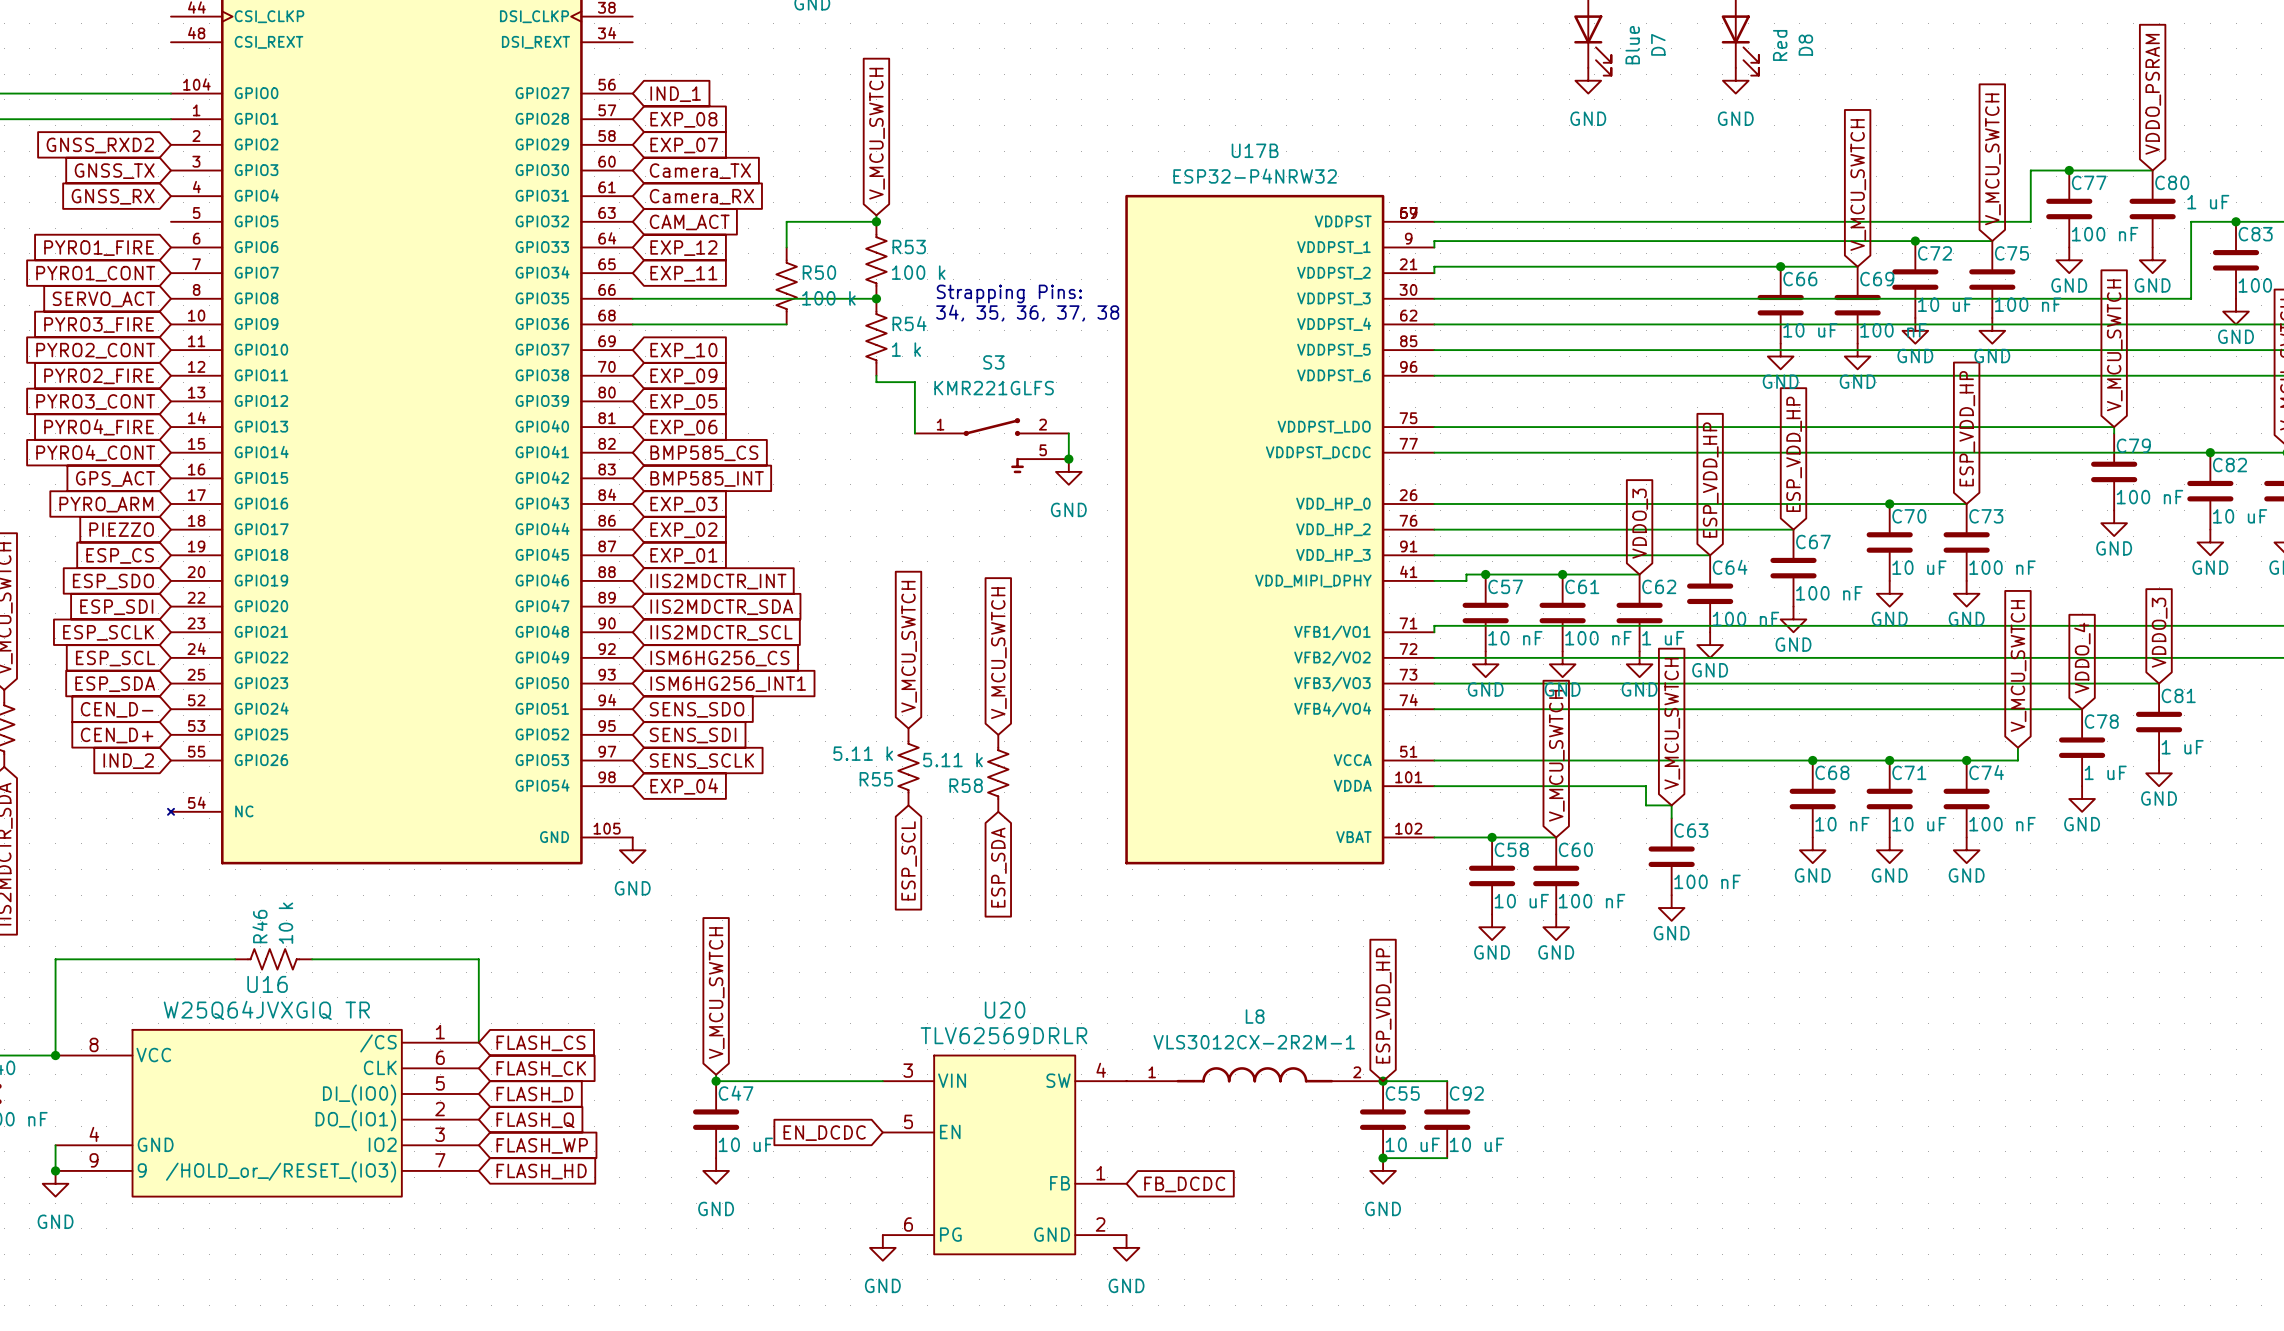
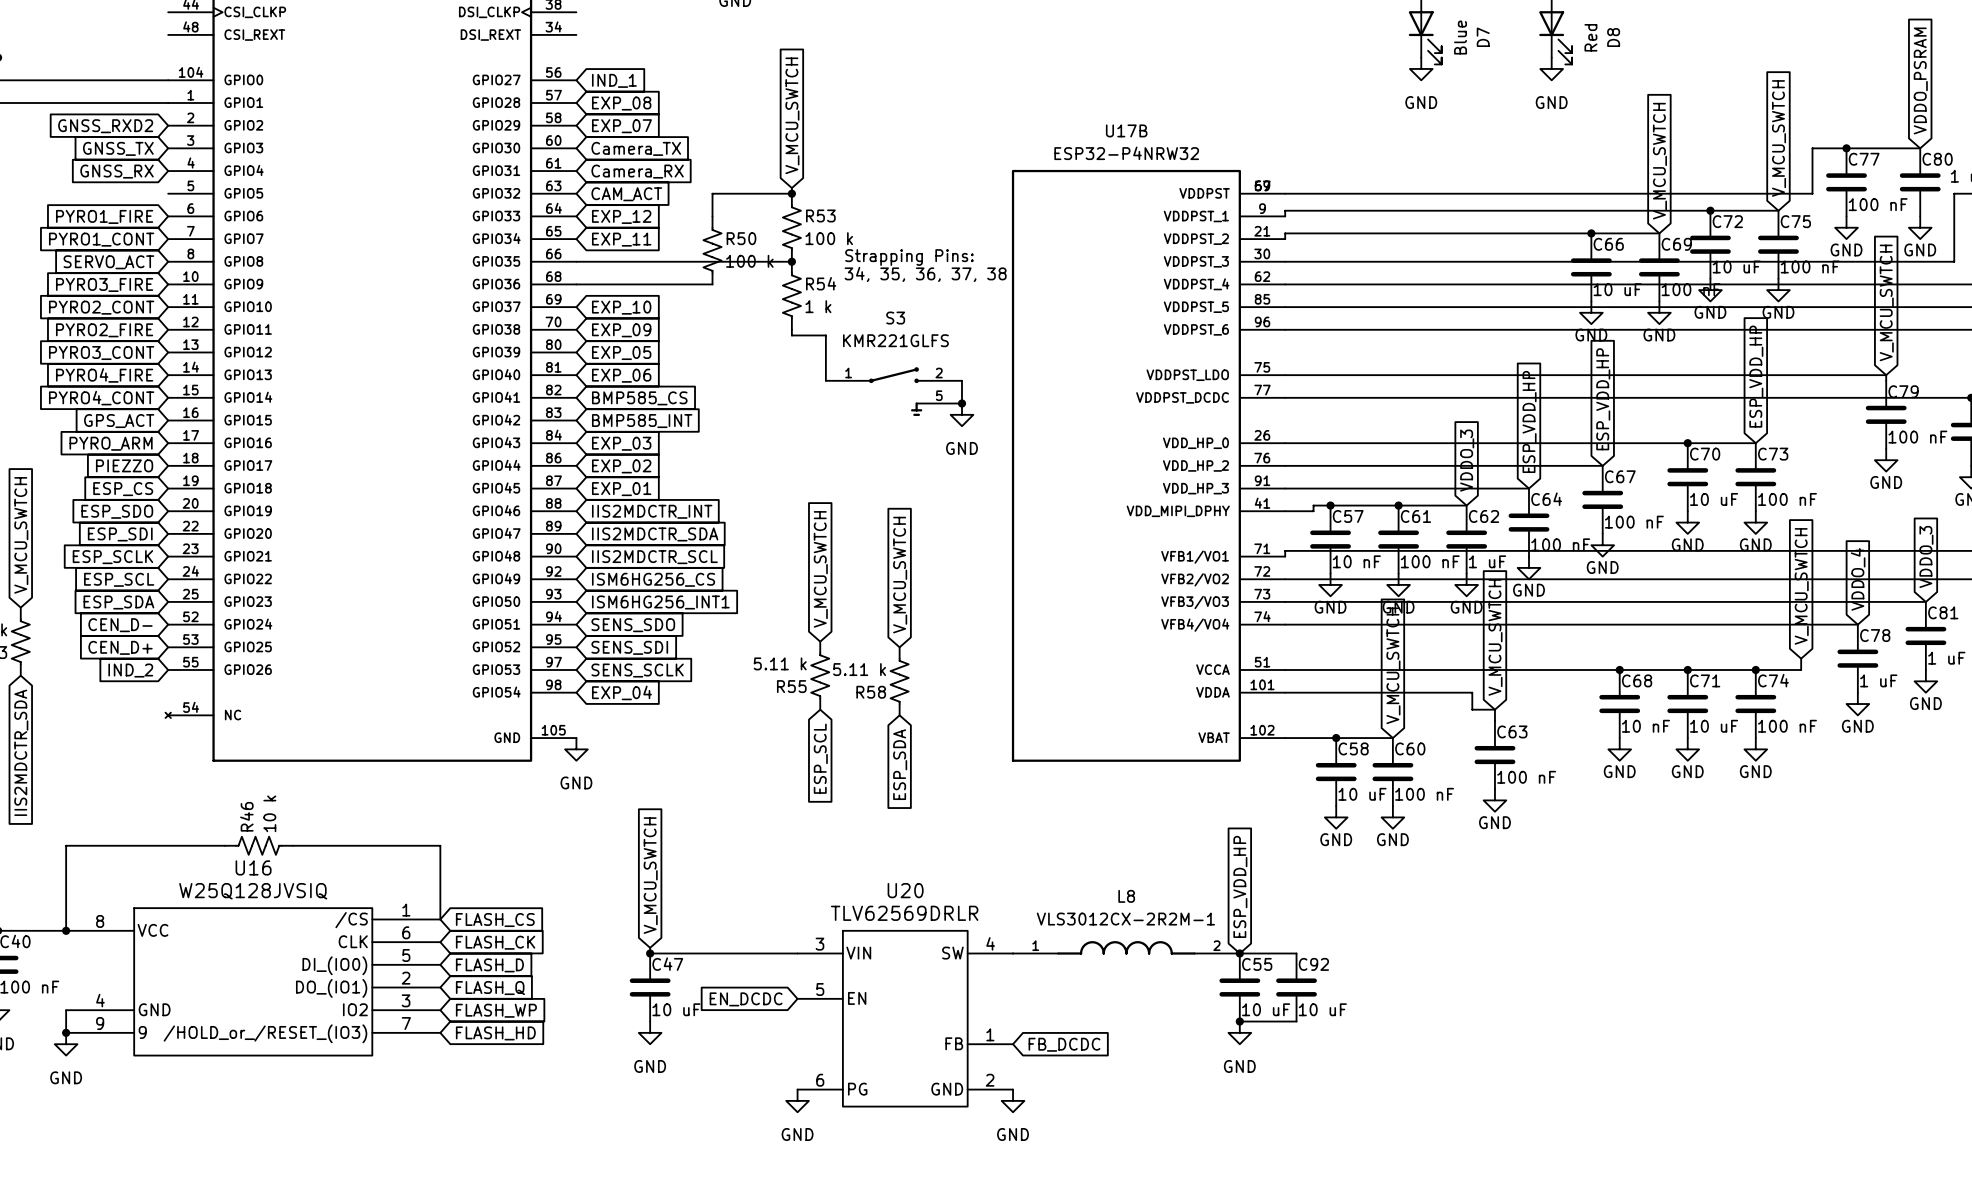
U16 value: W25Q64JVXGIQ TR (266, 1010) -> W25Q128JVSIQ (253, 891)

